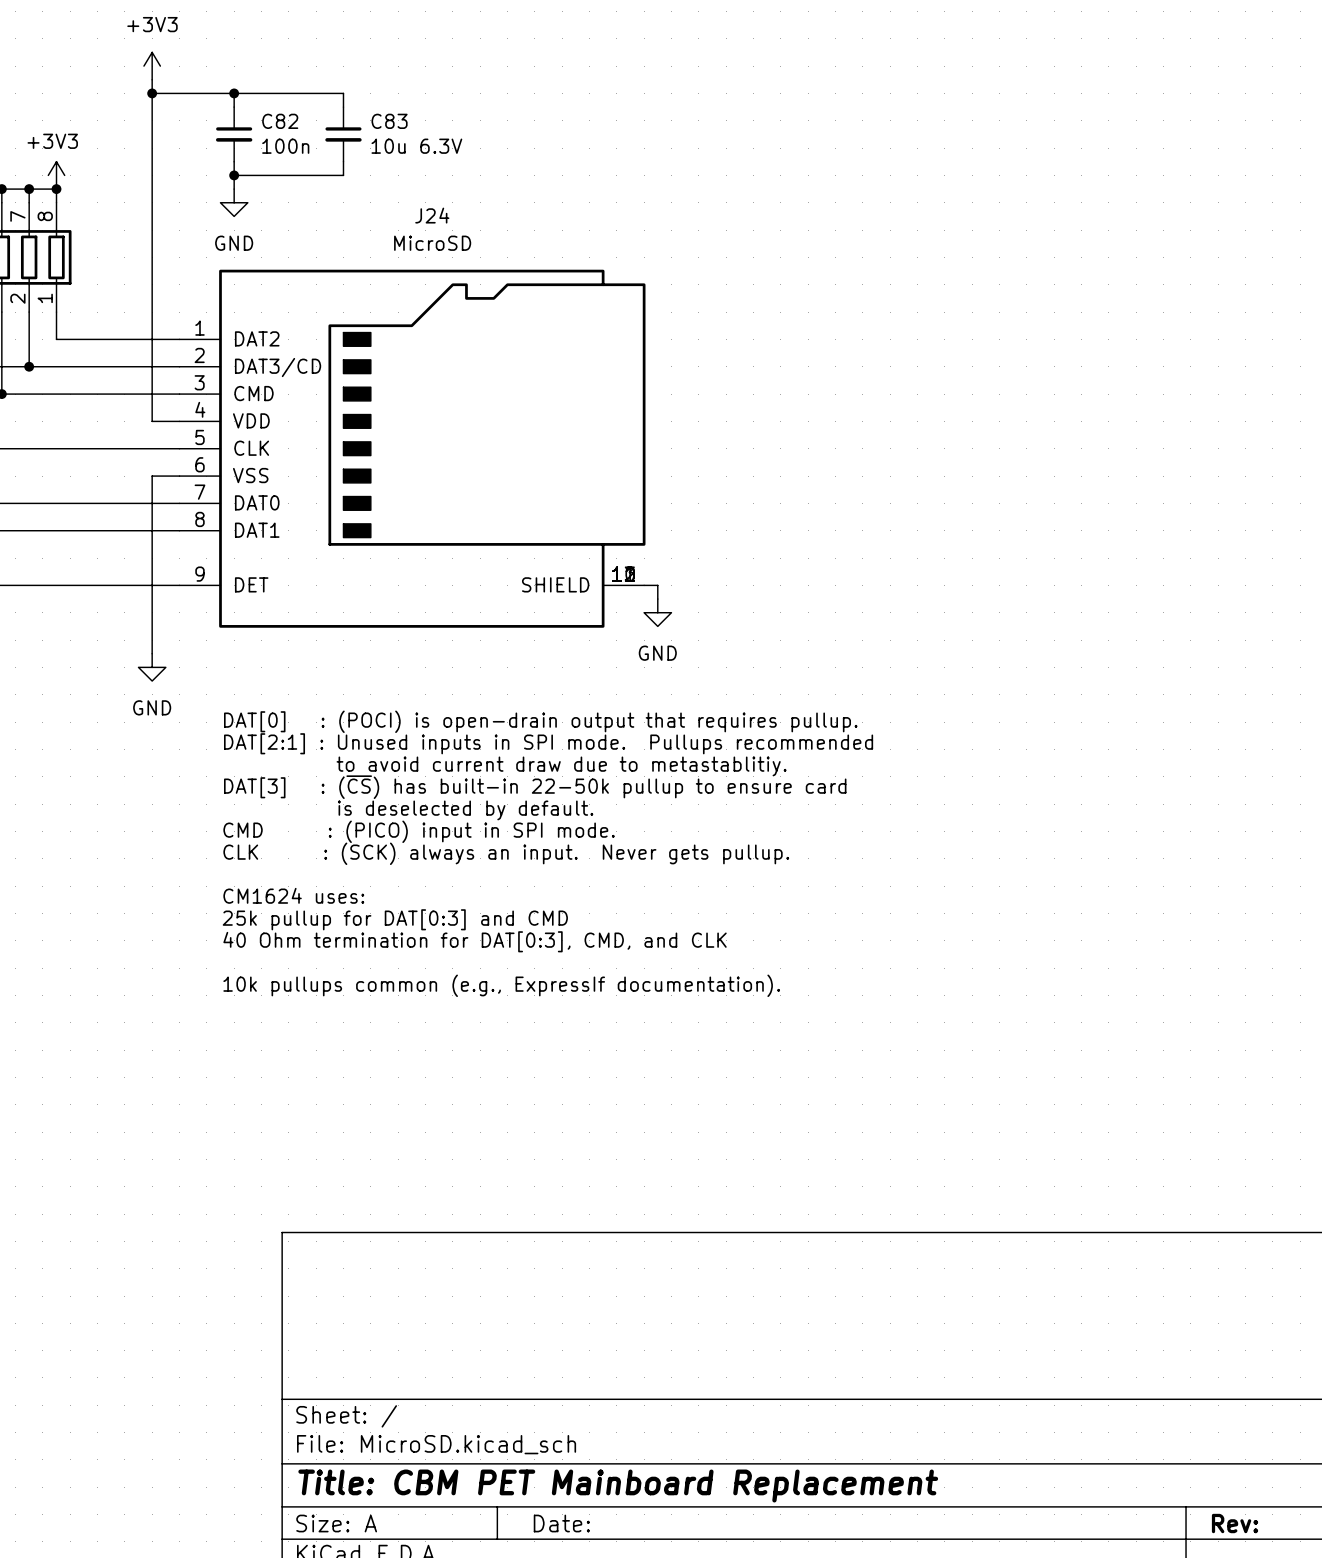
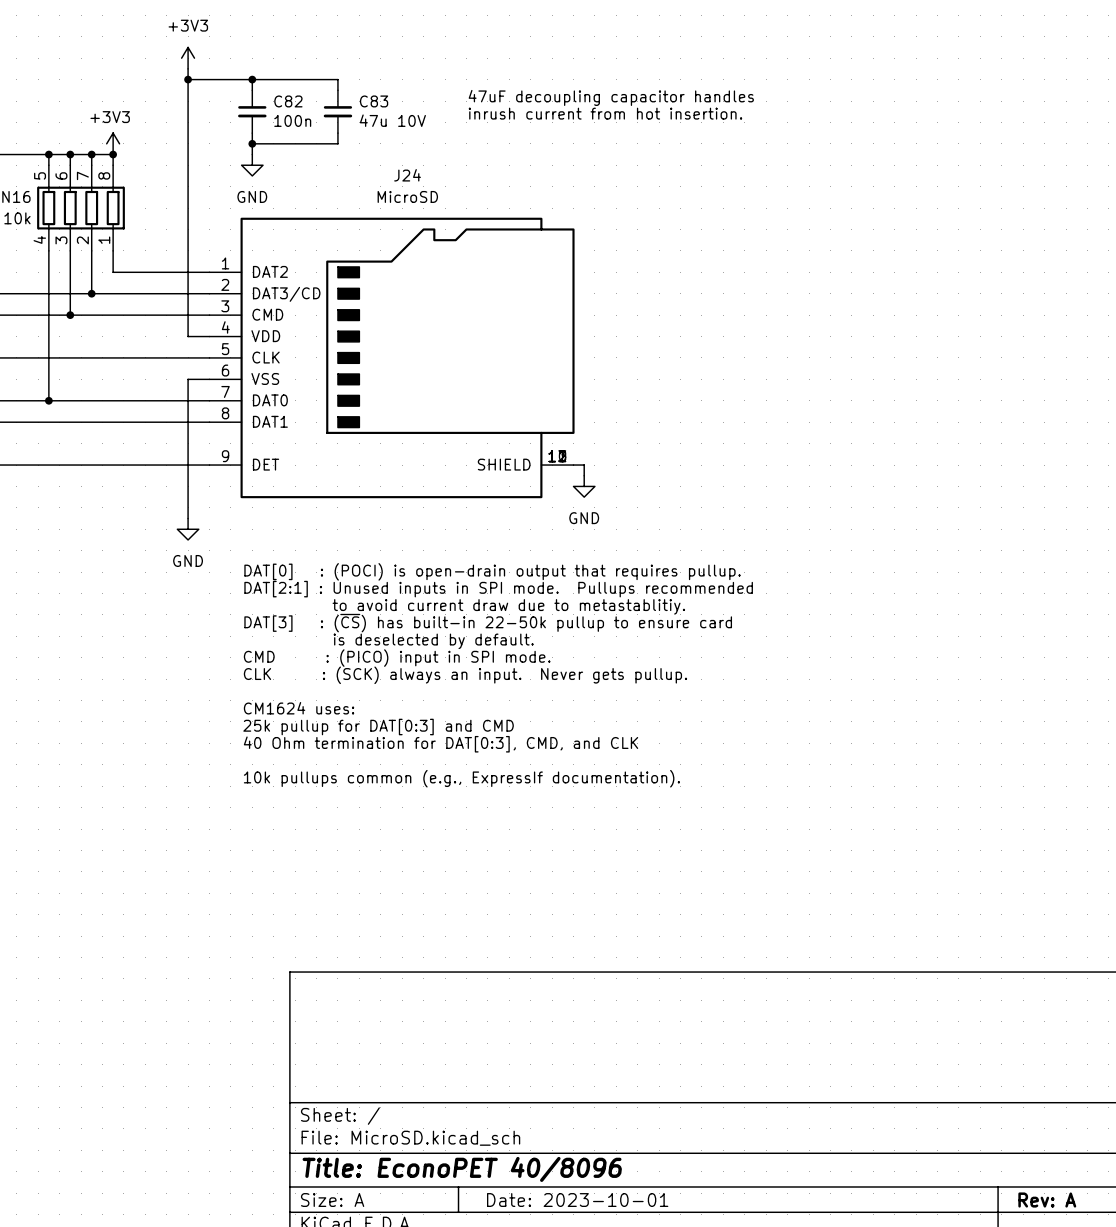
text: none -> 47uF decoupling capacitor handles (611, 97)
text: none -> inrush current from hot insertion. (605, 113)
C83 value: 10u 6.3V (416, 146) -> 47u 10V (392, 120)
title block: Title: CBM PET Mainboard Replacement (618, 1486) -> Title: EconoPET 40/8096 (462, 1169)
title block: Date: (561, 1523) -> Date: 2023-10-01 (577, 1200)
title block: Rev: (1235, 1523) -> Rev: A (1047, 1200)

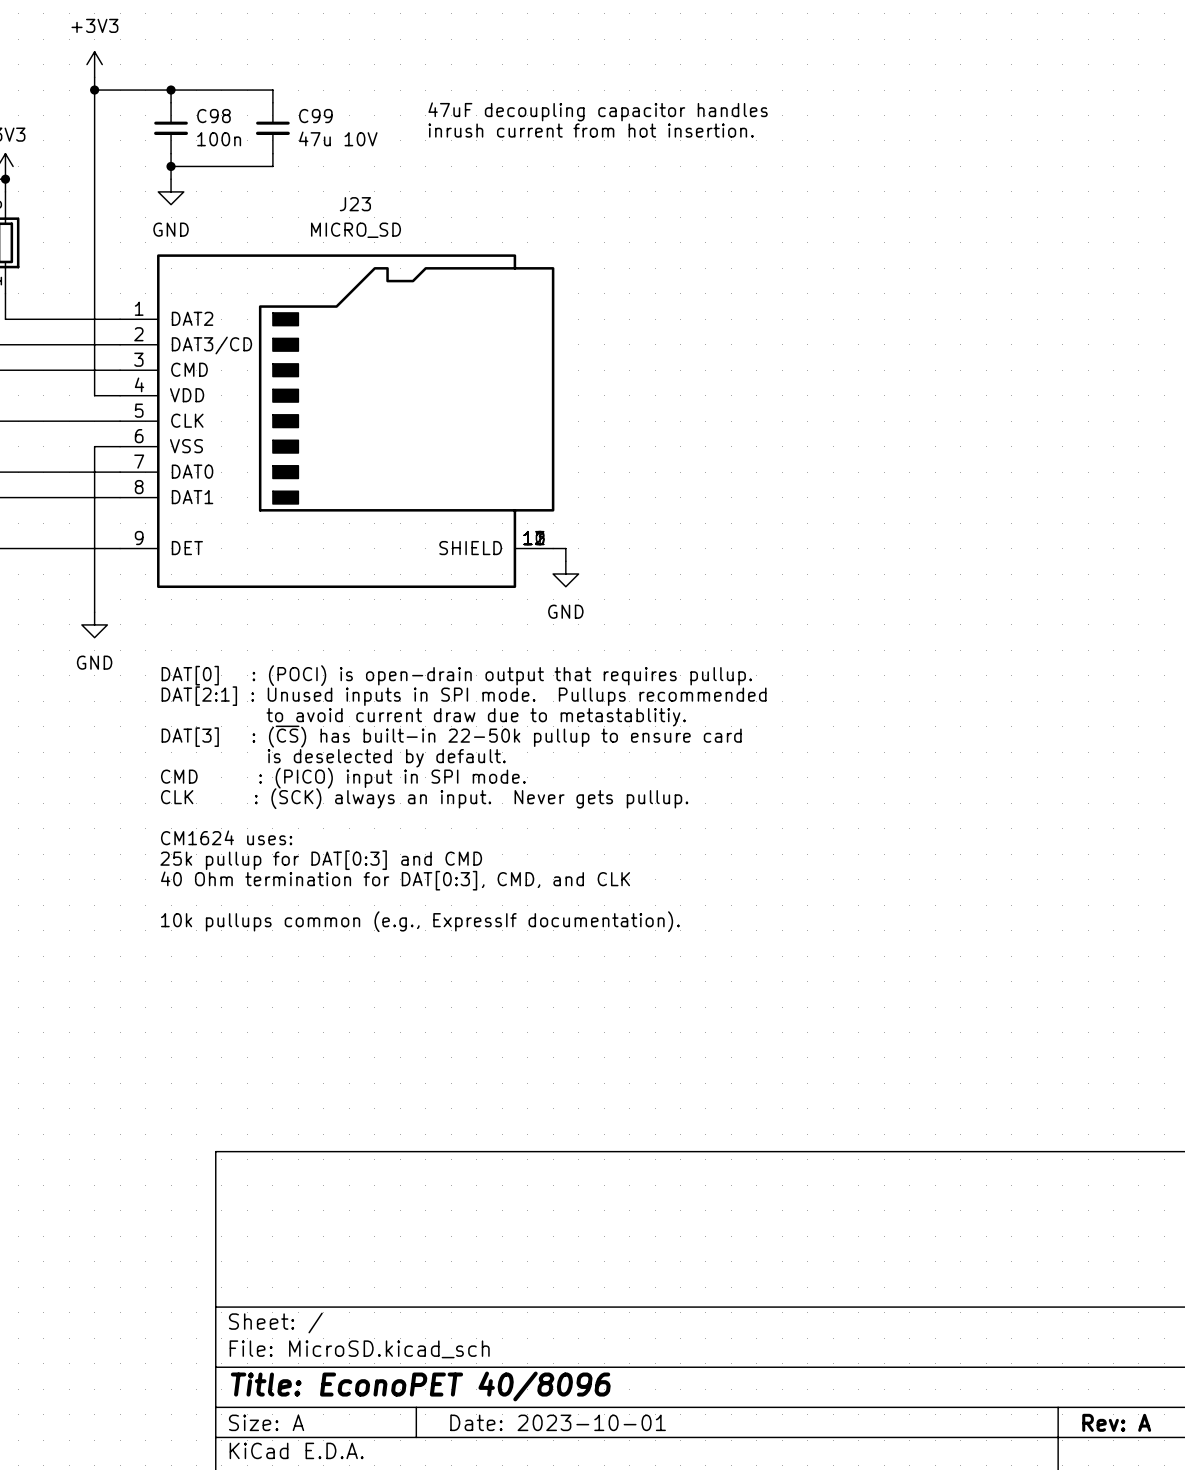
C82 name: C82 (288, 101) -> C98 (213, 116)
C83 name: C83 (374, 101) -> C99 (315, 116)
J24 name: J24 (407, 175) -> J23 (355, 204)
J24 value: MicroSD (407, 196) -> MICRO_SD (356, 230)

